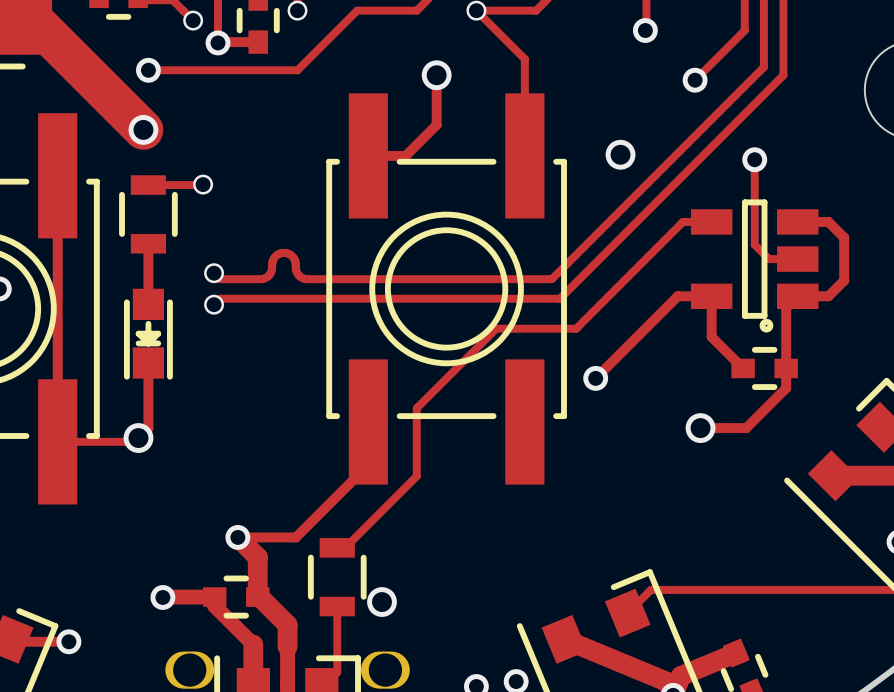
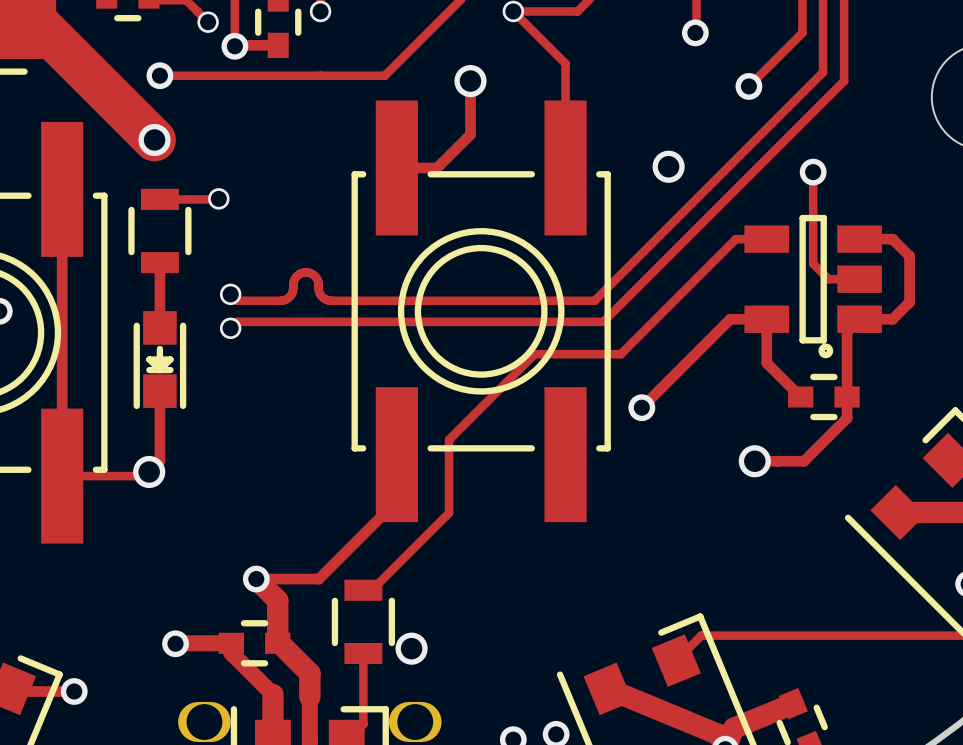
track: (416, 10) (357, 10) (297, 70) -> (449, 11) (384, 75) (320, 75)

